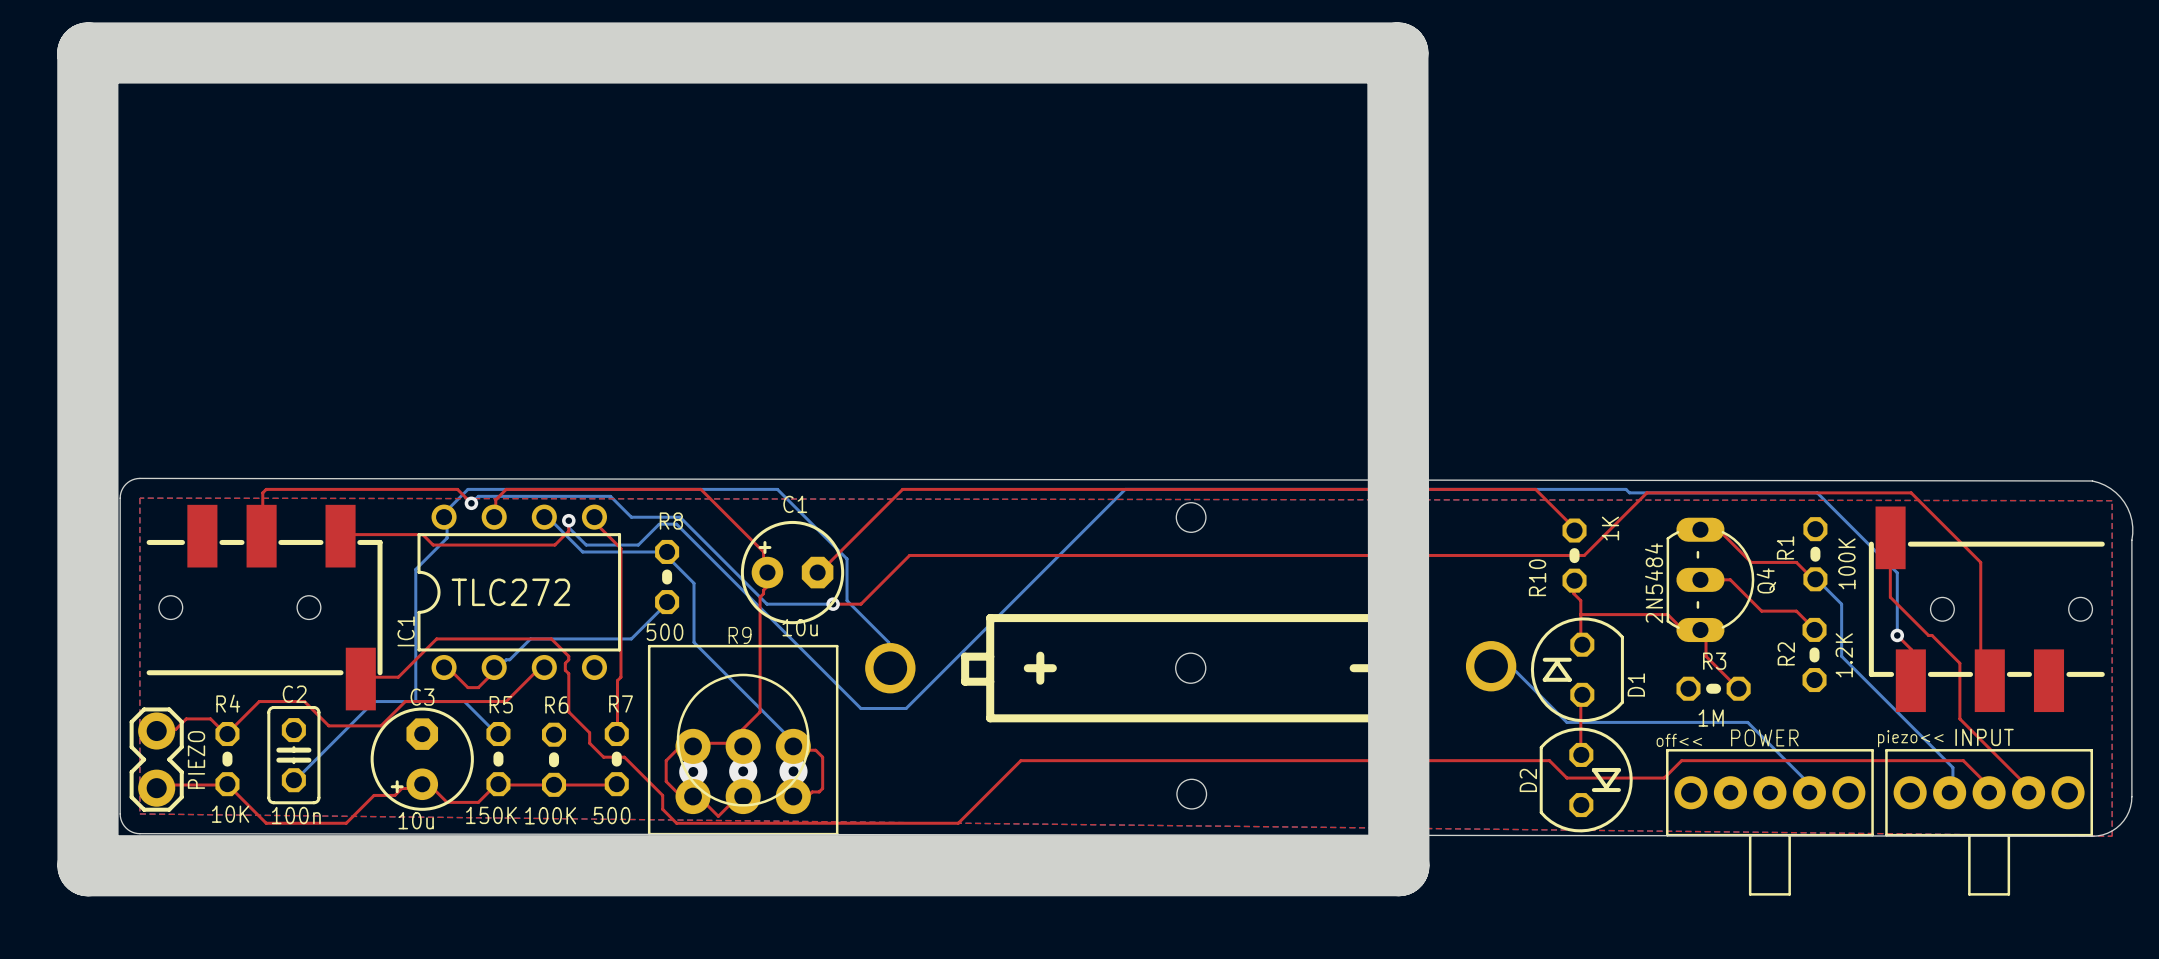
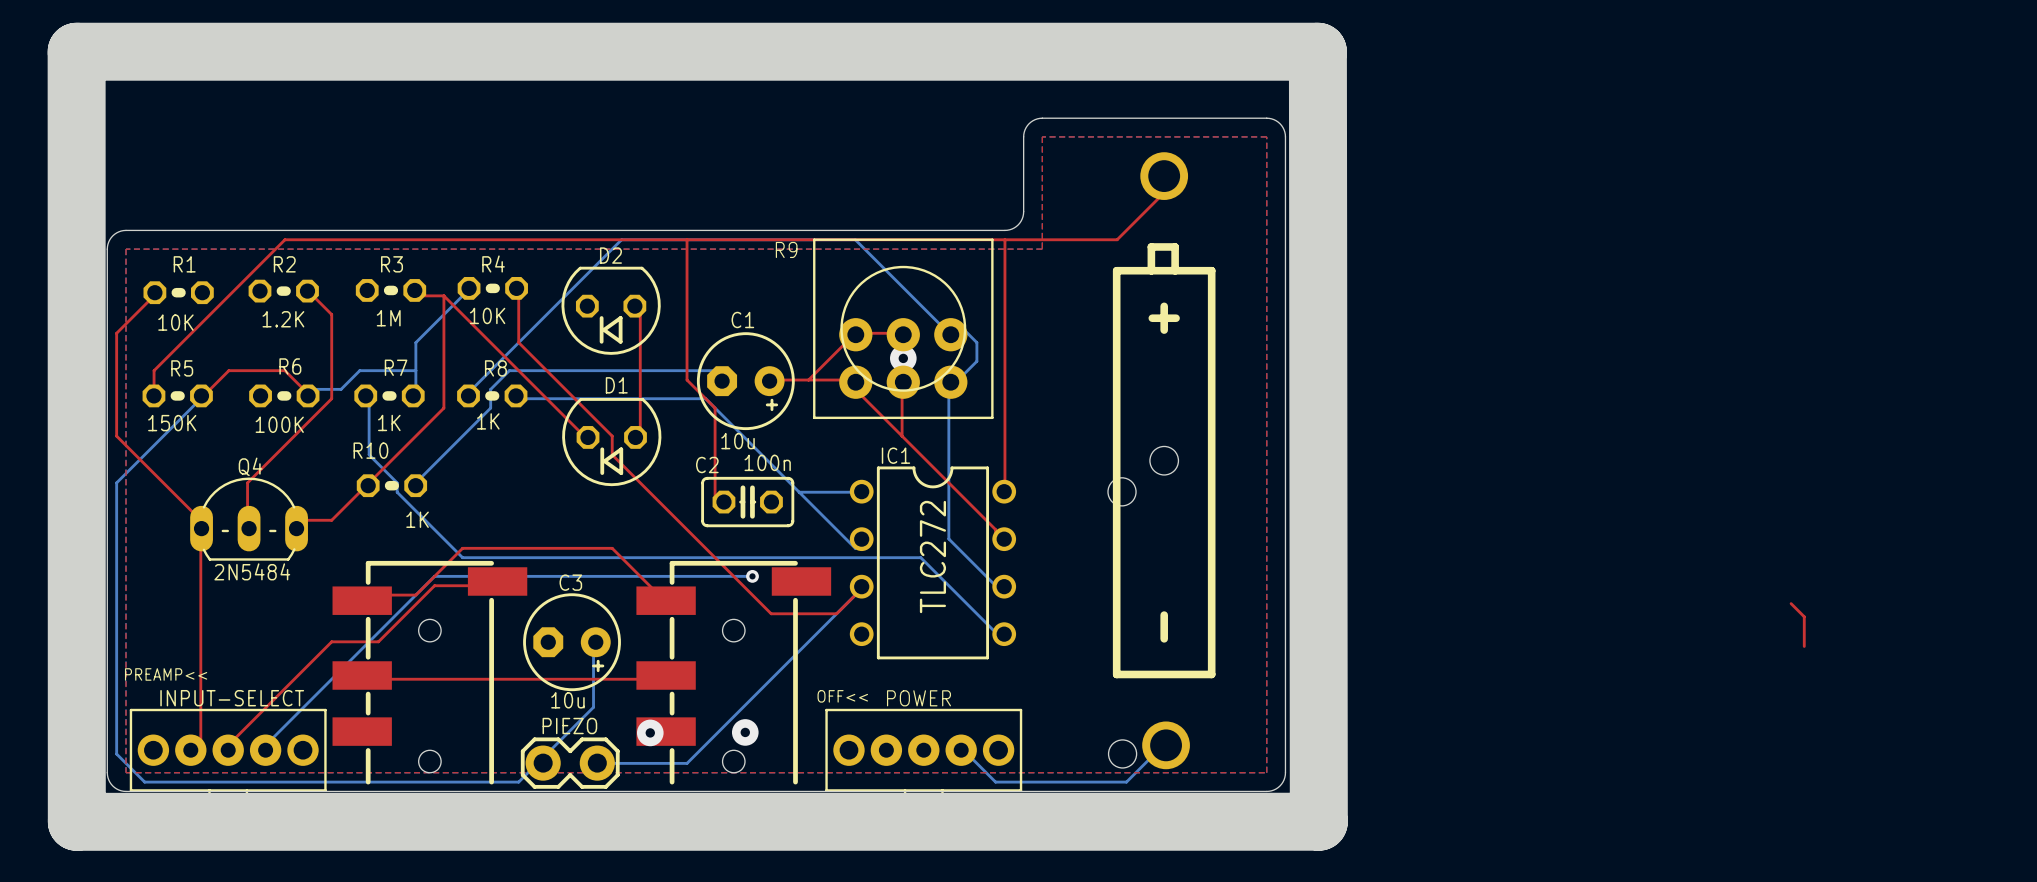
top track: none -> (1164, 176) (1173, 183) (1117, 239) (284, 239) (154, 370) (153, 395)
top track: none -> (687, 239) (687, 380) (715, 408) (715, 501) (723, 502)
top track: none -> (1004, 239) (1004, 491)
bottom track: none -> (469, 288) (415, 342) (415, 389) (413, 395)
top track: none -> (516, 288) (518, 295) (518, 342) (612, 436) (612, 454) (771, 613) (836, 613) (861, 586)
top track: none -> (414, 290) (415, 295) (443, 295)
top track: none -> (307, 291) (331, 314) (331, 398) (247, 482) (249, 528)
top track: none -> (154, 292) (154, 295) (116, 333) (116, 436) (200, 520) (200, 744) (191, 754) (190, 750)
top track: none -> (443, 295) (584, 436) (588, 437)
top track: none -> (443, 295) (443, 408) (331, 520) (303, 520) (296, 528)
top track: none -> (634, 306) (640, 314) (640, 436) (635, 437)
top track: none -> (903, 334) (855, 333) (808, 380)
via: none -> (903, 358)
bottom track: none -> (415, 370) (359, 370) (341, 389) (313, 389) (308, 395)
bottom track: none -> (722, 381) (724, 380) (715, 370) (509, 370) (490, 389) (490, 408) (415, 482) (415, 485)
top track: none -> (769, 381) (855, 380) (855, 389) (995, 529) (995, 538) (1004, 539)
top track: none -> (903, 382) (902, 436)
top track: none -> (201, 395) (228, 370) (284, 370) (308, 395)
bottom track: none -> (201, 395) (116, 482) (116, 754) (144, 782) (518, 782) (537, 763) (543, 763) (546, 754) (593, 707) (593, 651) (595, 642)
bottom track: none -> (365, 395) (369, 398) (369, 454) (397, 482) (397, 492) (462, 557) (920, 557) (995, 632) (1004, 634)
bottom track: none -> (468, 395) (471, 389) (621, 239) (855, 239) (948, 333) (950, 334) (939, 323) (958, 323) (976, 342) (976, 361) (958, 380) (950, 382) (948, 389) (948, 538) (995, 585) (1004, 586)
bottom track: none -> (516, 395) (518, 398) (705, 398) (855, 548) (861, 539)
board edge: (120, 498) (121, 490) (125, 484) (132, 479) (139, 478) (2092, 480) (2110, 488) (2120, 497) (2130, 514) (2132, 527) (2131, 801) (2126, 816) (2120, 824) (2112, 830) (2097, 835) (139, 833) -> (107, 473) (107, 249) (111, 237) (121, 231) (1007, 230) (1016, 226) (1023, 216) (1023, 134) (1027, 125) (1035, 119) (1266, 118) (1278, 122) (1284, 132) (1285, 772) (1282, 782) (1276, 788) (1266, 791) (126, 791)
top zone outline: (139, 498) (2112, 500) (2112, 836) (139, 813) -> (126, 473) (126, 249) (1042, 249) (1042, 136) (1266, 136) (1266, 772) (126, 772)
top track: (471, 503) (457, 489) (266, 489) (262, 492) (261, 536) -> none
bottom track: (471, 503) (478, 496) (610, 496) (631, 517) (680, 517) (767, 604) (833, 604) -> none
via: (471, 503) -> none
top track: (494, 517) (495, 499) (506, 489) (700, 489) (763, 552) (763, 565) (767, 569) (767, 586) (760, 597) (760, 711) (742, 729) (742, 743) -> none
bottom track: (544, 517) (544, 513) (582, 552) (667, 551) (662, 552) (694, 583) (694, 642) (784, 732) (784, 736) (793, 746) -> none
top track: (594, 517) (596, 517) (596, 524) (620, 548) (620, 677) (617, 680) (616, 734) -> none
bottom track: none -> (861, 491) (799, 492)
top track: (568, 520) (568, 531) (554, 545) (433, 545) (422, 534) (342, 534) (340, 536) -> none
bottom track: (568, 520) (568, 527) (586, 545) (638, 545) (659, 524) (676, 524) (860, 708) (906, 708) (1125, 489) (1626, 489) (1629, 492) (1817, 492) (1897, 572) (1897, 635) -> none
via: (568, 520) -> none
top track: (1700, 529) (1719, 531) (1751, 562) (1796, 562) (1815, 579) -> none
top track: (1574, 530) (1535, 489) (902, 489) (817, 572) -> none
top track: (1890, 538) (1890, 597) (1959, 663) (1959, 718) (2025, 785) (2025, 791) (2028, 792) -> none
R1 rotation: 0° (1815, 554) -> 90° clockwise (178, 292)
R1 position: (1815, 554) -> (178, 292)
R10 rotation: 0° (1574, 555) -> 90° clockwise (391, 485)
R10 position: (1574, 555) -> (391, 485)
R1 value: 100K (1846, 563) -> 10K (175, 322)
C1 rotation: 0° (792, 572) -> 180° (745, 381)
C1 position: (792, 572) -> (745, 381)
R8 rotation: 0° (667, 577) -> 90° clockwise (492, 395)
R8 position: (667, 577) -> (492, 395)
top track: (1700, 579) (1730, 579) (1761, 611) (1796, 611) (1814, 629) -> none
Q4 rotation: 0° (1710, 579) -> 90° counterclockwise (249, 519)
Q4 position: (1710, 579) -> (249, 519)
bottom track: (1815, 579) (1841, 604) (1841, 656) (1952, 767) (1952, 791) (1949, 792) -> none
top track: (1574, 580) (1573, 593) (1580, 600) (1582, 644) -> none
IC1 rotation: 0° (519, 592) -> 90° clockwise (932, 562)
IC1 position: (519, 592) -> (932, 562)
bottom track: (667, 602) (631, 638) (530, 638) (509, 659) (506, 659) (495, 670) (494, 667) -> none
top track: (833, 604) (860, 604) (909, 555) (1584, 555) (1646, 492) (1911, 492) (1980, 562) (1980, 673) (1989, 680) -> none
via position: (833, 604) -> (752, 576)
bottom track: none -> (752, 576) (434, 576) (266, 744) (265, 750)
part rotation: 0° (264, 607) -> 90° counterclockwise (429, 672)
part position: (264, 607) -> (429, 672)
part: (1986, 609) -> none
top track: none -> (497, 581) (490, 585) (434, 585) (378, 641) (331, 641) (228, 744) (228, 750)
top track: (1580, 614) (1667, 614) (1681, 628) (1699, 628) (1706, 635) (1706, 656) (1738, 688) -> none
bottom track: none -> (861, 586) (687, 763) (597, 763)
top track: none -> (362, 600) (369, 595) (415, 595) (462, 548) (612, 548) (666, 600)
R8 value: 500 (664, 632) -> 1K (488, 421)
R9 name position: R9 (740, 635) -> R9 (786, 249)
via: (1897, 635) -> none
R2 rotation: 0° (1814, 654) -> 90° clockwise (283, 291)
R2 position: (1814, 654) -> (283, 291)
bottom track: (1491, 666) (1511, 666) (1566, 722) (1747, 722) (1806, 781) (1806, 791) (1809, 792) -> none
top track: (444, 667) (450, 670) (467, 687) (478, 687) (495, 670) (494, 667) -> none
top track: (544, 667) (537, 670) (506, 701) (405, 701) (381, 725) (328, 725) (304, 701) (259, 701) (227, 734) (210, 718) (186, 718) (175, 729) (156, 731) -> none
bottom track: (890, 668) (888, 642) (847, 600) (847, 558) (777, 489) (467, 489) (443, 513) (444, 517) (447, 517) (447, 538) (415, 569) (415, 701) -> none
part rotation: 0° (1190, 668) -> 90° clockwise (1164, 460)
D1 rotation: 0° (1577, 669) -> 90° counterclockwise (611, 442)
D1 position: (1577, 669) -> (611, 442)
top track: (360, 679) (363, 677) (398, 677) (436, 638) (551, 638) (568, 656) (568, 659) (565, 663) (565, 670) (568, 673) (568, 711) (589, 732) (589, 743) (603, 757) (624, 757) (662, 795) (662, 809) (676, 823) (958, 823) (1020, 760) (1549, 760) (1566, 778) (1664, 778) (1681, 760) (1963, 760) (1987, 785) (1989, 792) -> none
R3 position: (1713, 688) -> (390, 290)
C2 name position: C2 (294, 694) -> C2 (707, 465)
top track: (1582, 694) (1581, 754) -> none
part: none -> (733, 672)
text: none -> PREAMP<< (166, 674)
top track: none -> (362, 675) (369, 679) (658, 679) (666, 675)
text: none -> OFF<< (842, 696)
bottom track: (498, 734) (464, 701) (374, 701) (293, 780) -> none
text: none -> POWER (918, 698)
text: POWER (1764, 737) -> none
text: piezo<< (1910, 738) -> none
R9 position: (743, 740) -> (903, 328)
text: off<< (1679, 740) -> none
top track: (742, 743) (694, 743) (693, 746) (680, 746) (666, 760) (666, 781) (680, 795) (690, 795) (694, 798) (700, 798) (718, 816) (735, 798) (742, 798) (743, 796) -> none
top track: (793, 746) (798, 750) (815, 750) (822, 757) (822, 788) (819, 791) (812, 791) (808, 795) (793, 796) -> none
C2 rotation: 0° (293, 755) -> 90° clockwise (747, 502)
C2 position: (293, 755) -> (747, 502)
PIEZO rotation: 0° (156, 759) -> 90° clockwise (570, 763)
PIEZO position: (156, 759) -> (570, 763)
PIEZO name position: PIEZO (196, 759) -> PIEZO (569, 726)
R4 rotation: 0° (227, 759) -> 90° clockwise (492, 288)
R4 position: (227, 759) -> (492, 288)
C3 rotation: 0° (422, 759) -> 90° counterclockwise (572, 642)
C3 position: (422, 759) -> (572, 642)
R5 rotation: 0° (498, 759) -> 90° clockwise (177, 395)
R5 position: (498, 759) -> (177, 395)
R6 rotation: 0° (554, 759) -> 90° clockwise (284, 395)
R6 position: (554, 759) -> (284, 395)
R7 rotation: 0° (616, 759) -> 90° clockwise (389, 395)
R7 position: (616, 759) -> (389, 395)
via: (743, 771) -> none
D2 rotation: 0° (1586, 780) -> 90° clockwise (611, 310)
D2 position: (1586, 780) -> (611, 310)
top track: (616, 784) (498, 784) (478, 802) (447, 802) (429, 785) (422, 784) (415, 788) (401, 788) (394, 795) (374, 795) (346, 823) (266, 823) (227, 784) (158, 785) (156, 788) -> none
bottom track: none -> (1166, 745) (1163, 744) (1126, 782) (995, 782) (967, 754) (961, 750)
C2 value position: 100n (296, 815) -> 100n (767, 462)
R7 value: 500 (612, 815) -> 1K (389, 422)
INPUT-SELECT: none -> (228, 778)
part: none -> (923, 778)
part: (1769, 822) -> none
INPUT: (1989, 822) -> none

